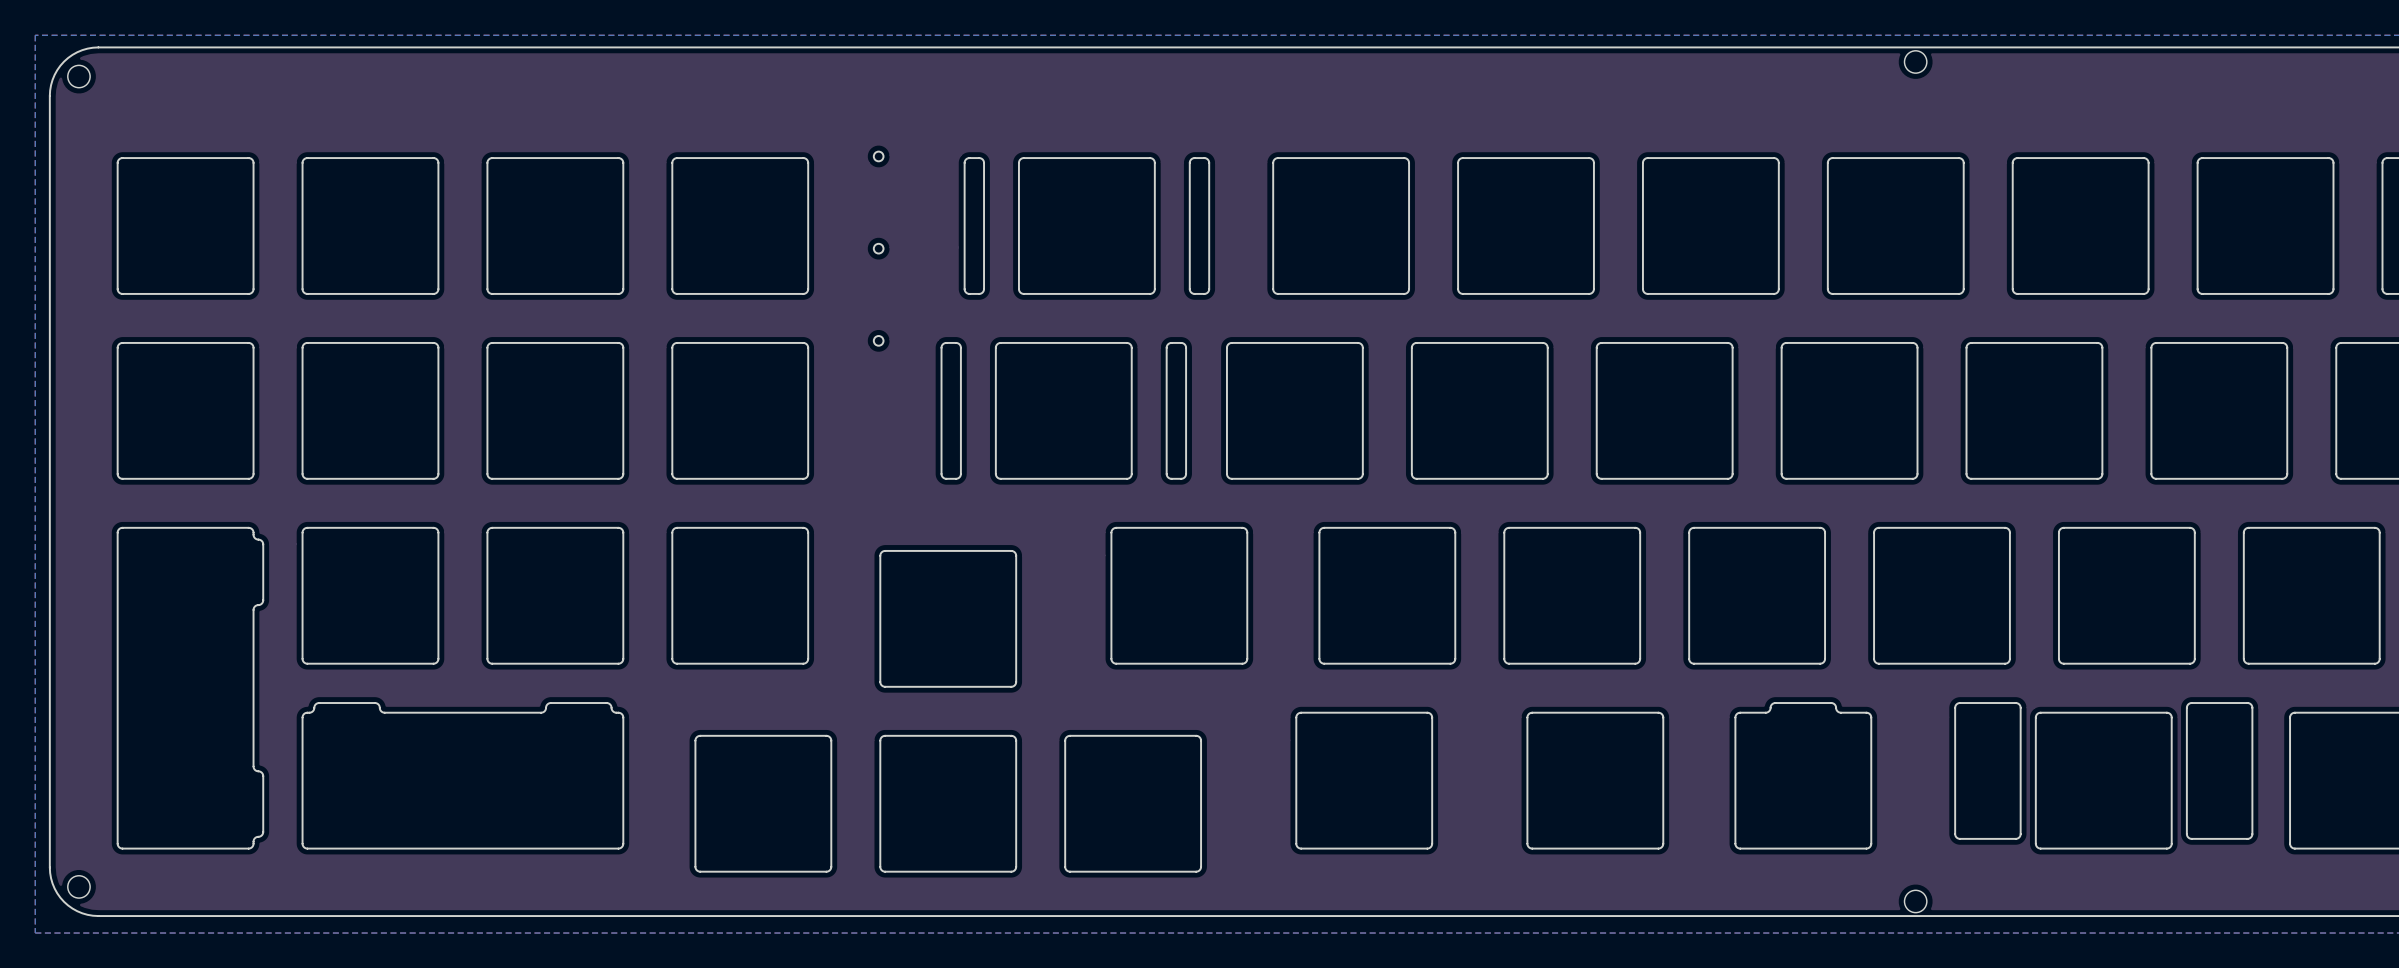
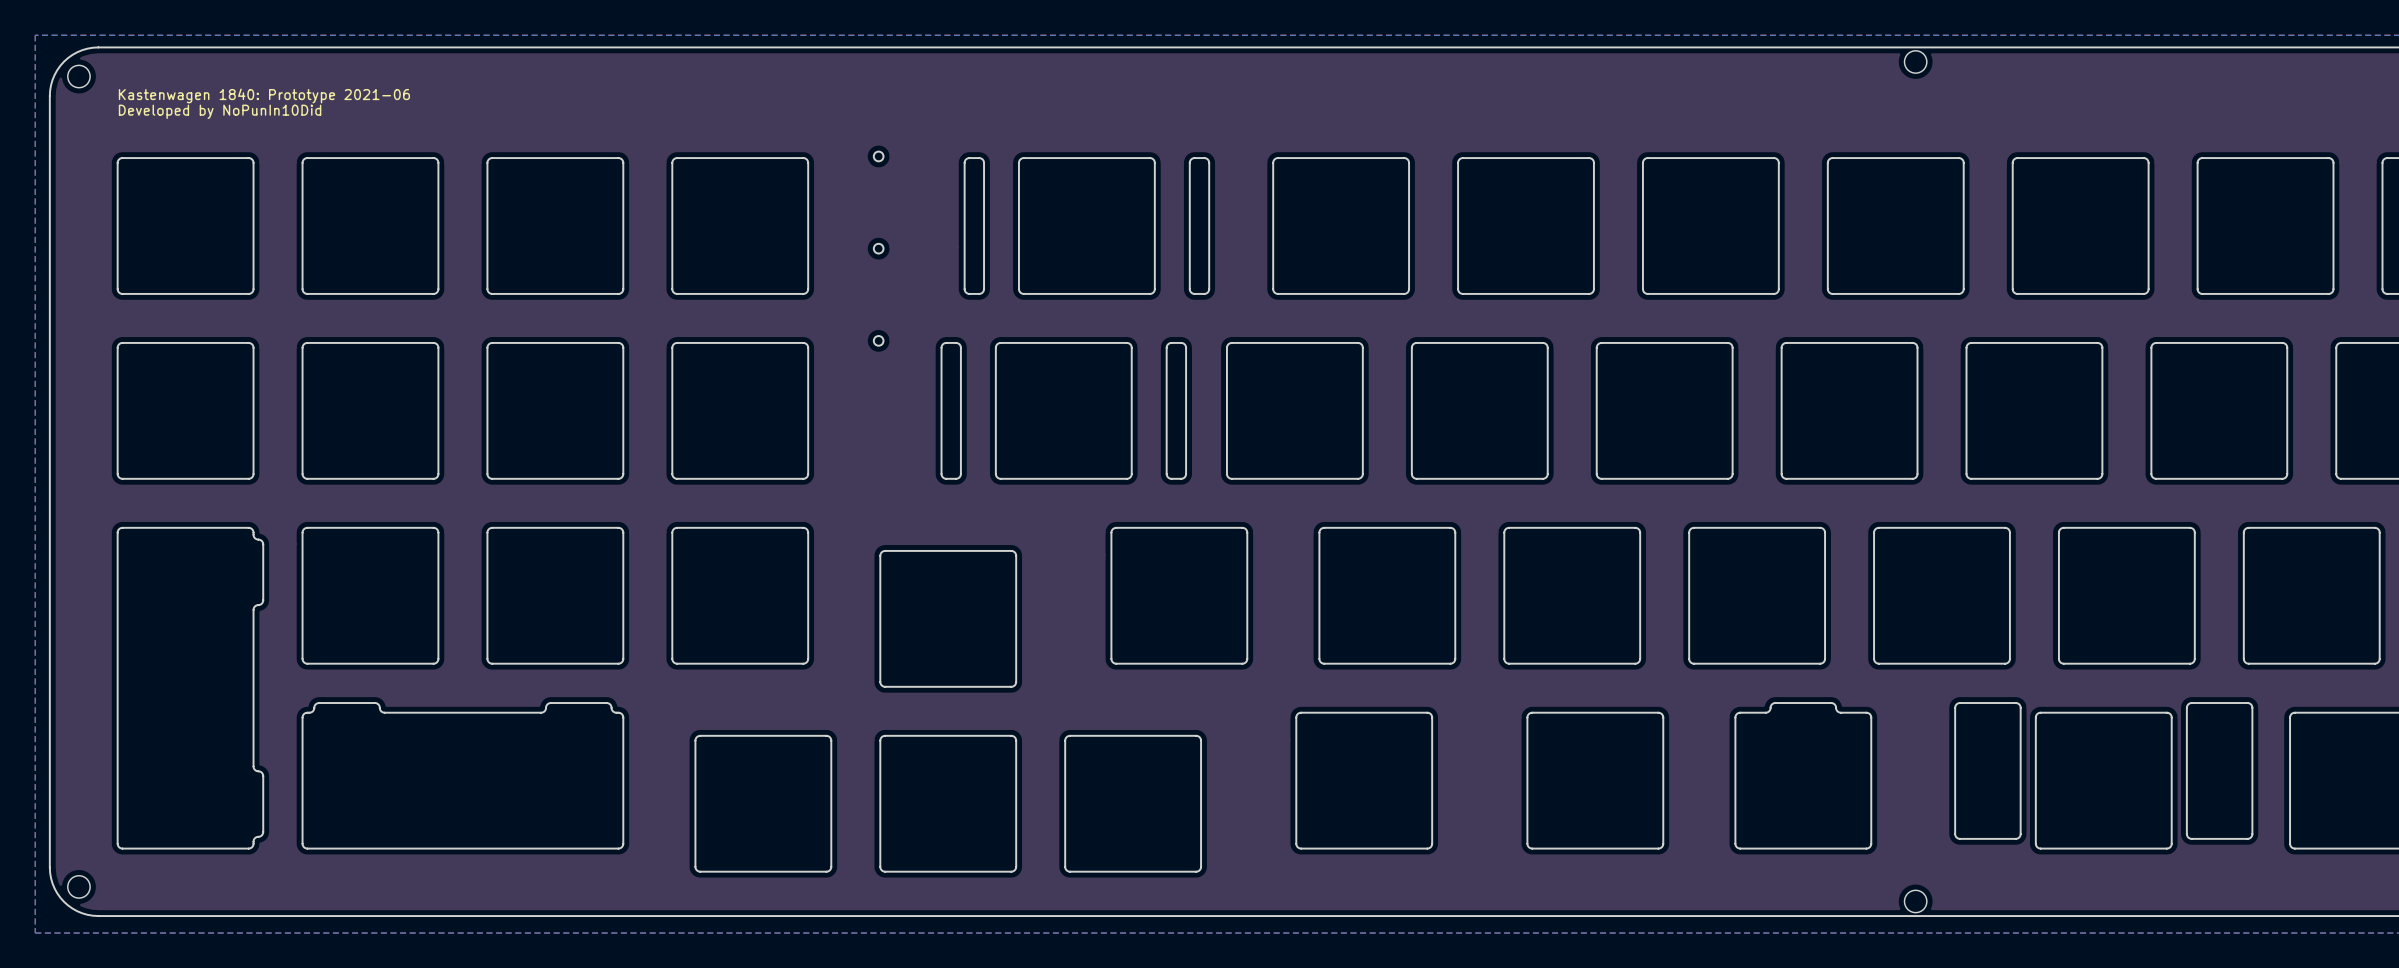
text: none -> Kastenwagen 1840: Prototype 2021-06 (264, 95)
text: none -> Developed by NoPunIn10Did (220, 111)

